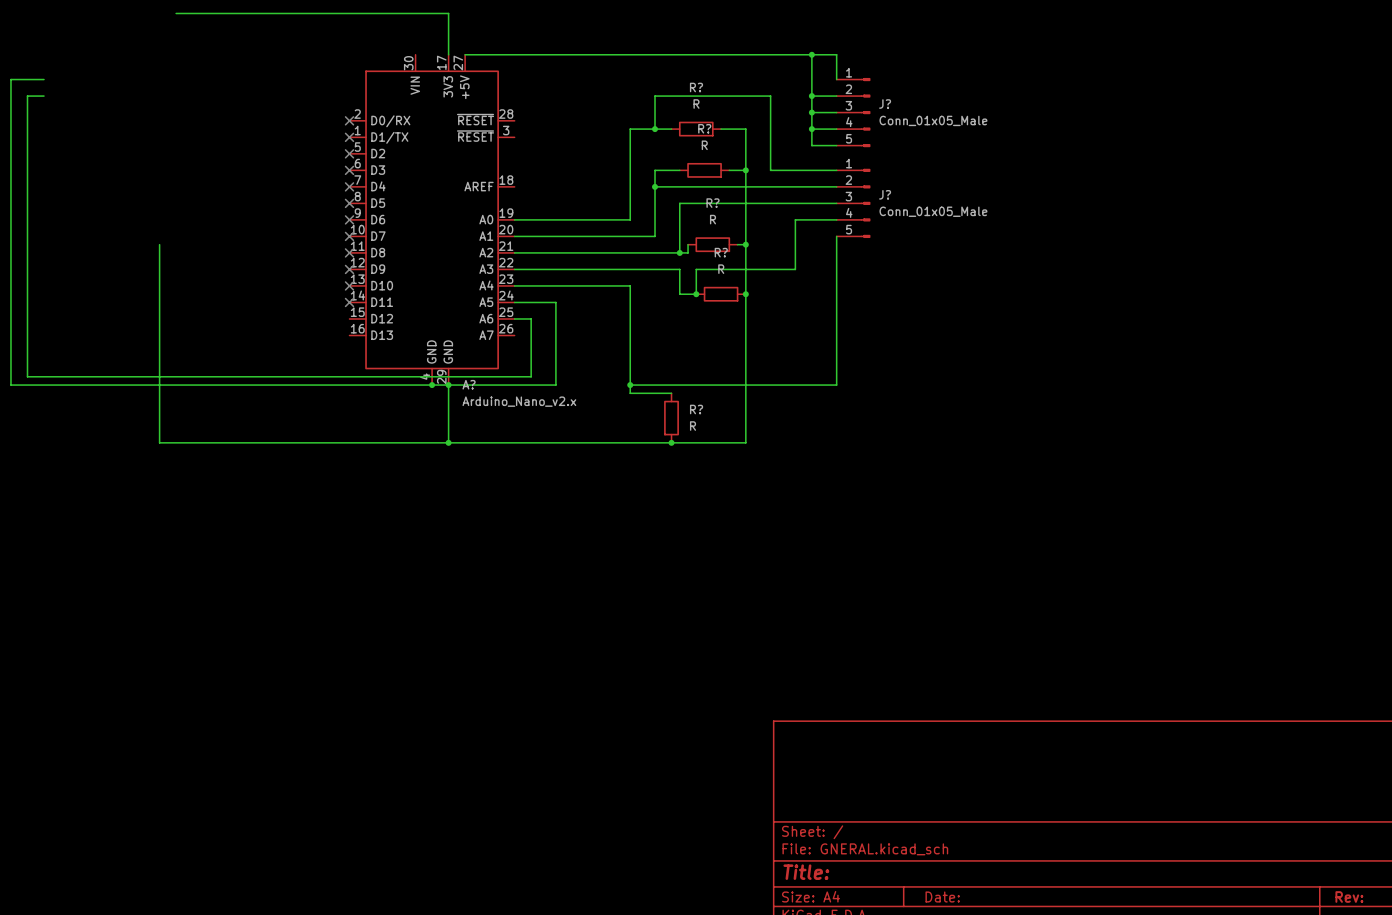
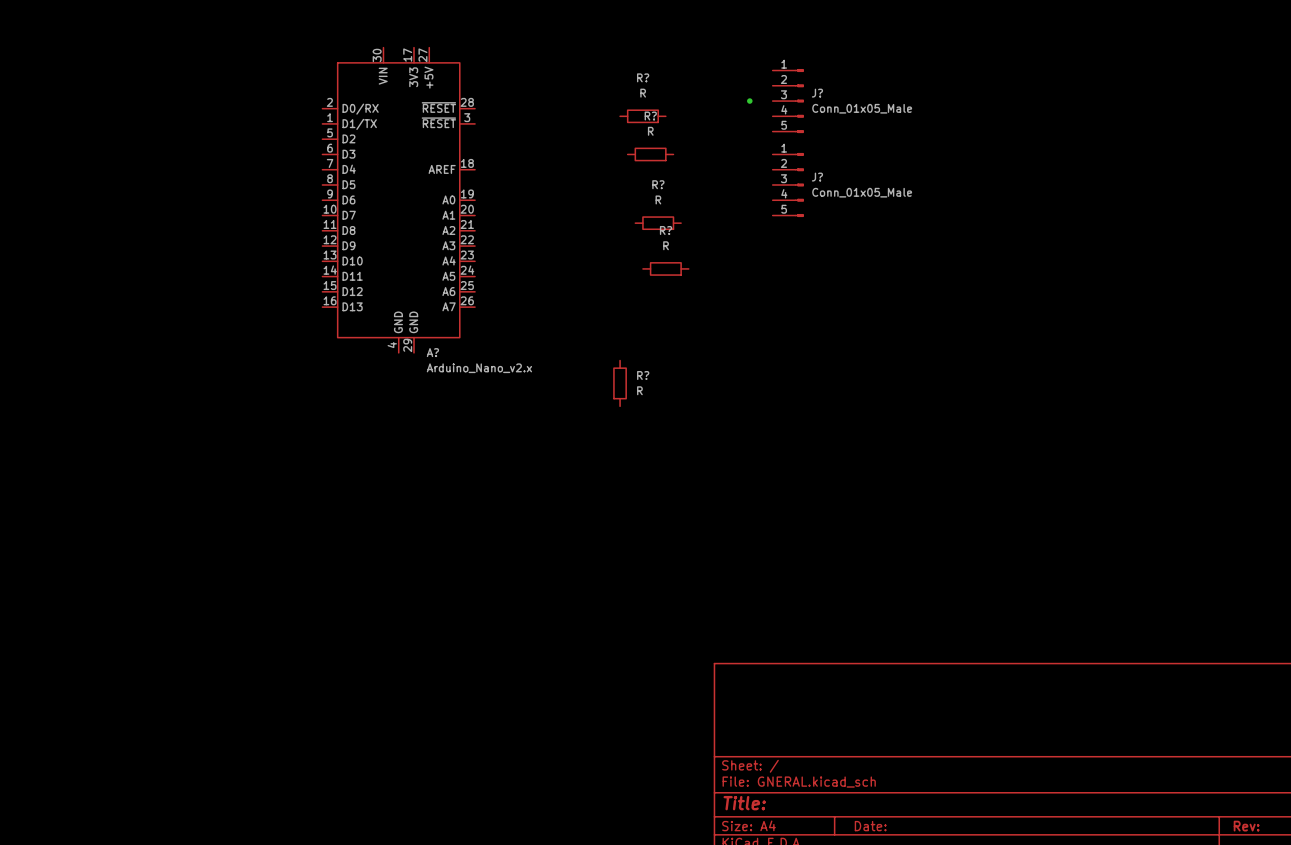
wire: (176, 13) (448, 13) (448, 54) -> none
wire: (465, 54) (836, 54) (836, 79) -> none
wire: (811, 54) (811, 145) (836, 145) -> none
junction: (811, 54) -> none
wire: (44, 79) (10, 79) (10, 385) (555, 385) (555, 302) (514, 302) -> none
wire: (44, 96) (27, 96) (27, 376) (531, 376) (531, 318) (514, 318) -> none
wire: (811, 96) (836, 96) -> none
junction: (811, 96) -> none
wire: (811, 112) (836, 112) -> none
no-connect mark: (349, 120) -> none
wire: (655, 129) (655, 96) (770, 96) (770, 170) (836, 170) -> none
junction: (655, 129) -> none
wire: (671, 129) (630, 129) (630, 219) (514, 219) -> none
wire: (721, 129) (745, 129) (745, 442) (159, 442) (159, 244) -> none
wire: (811, 129) (836, 129) -> none
junction: (811, 129) -> none
no-connect mark: (349, 137) -> none
no-connect mark: (349, 153) -> none
no-connect mark: (349, 170) -> none
wire: (679, 170) (655, 170) (655, 236) (514, 236) -> none
wire: (729, 170) (745, 170) -> none
junction: (745, 170) -> none
no-connect mark: (349, 186) -> none
wire: (655, 186) (836, 186) -> none
junction: (655, 186) -> none
no-connect mark: (349, 203) -> none
wire: (836, 203) (679, 203) (679, 252) -> none
no-connect mark: (349, 219) -> none
wire: (836, 219) (795, 219) (795, 269) (696, 269) (696, 294) (679, 294) (679, 269) (514, 269) -> none
no-connect mark: (349, 236) -> none
wire: (836, 236) (836, 385) (630, 385) -> none
wire: (688, 244) (688, 252) (514, 252) -> none
wire: (737, 244) (745, 244) -> none
junction: (745, 244) -> none
no-connect mark: (349, 252) -> none
junction: (679, 252) -> none
no-connect mark: (349, 269) -> none
no-connect mark: (349, 285) -> none
wire: (514, 285) (630, 285) (630, 393) (671, 393) -> none
junction: (696, 294) -> none
junction: (745, 294) -> none
no-connect mark: (349, 302) -> none
junction: (432, 385) -> none
wire: (448, 385) (448, 442) -> none
junction: (448, 385) -> none
junction: (630, 385) -> none
junction: (448, 442) -> none
junction: (671, 442) -> none

